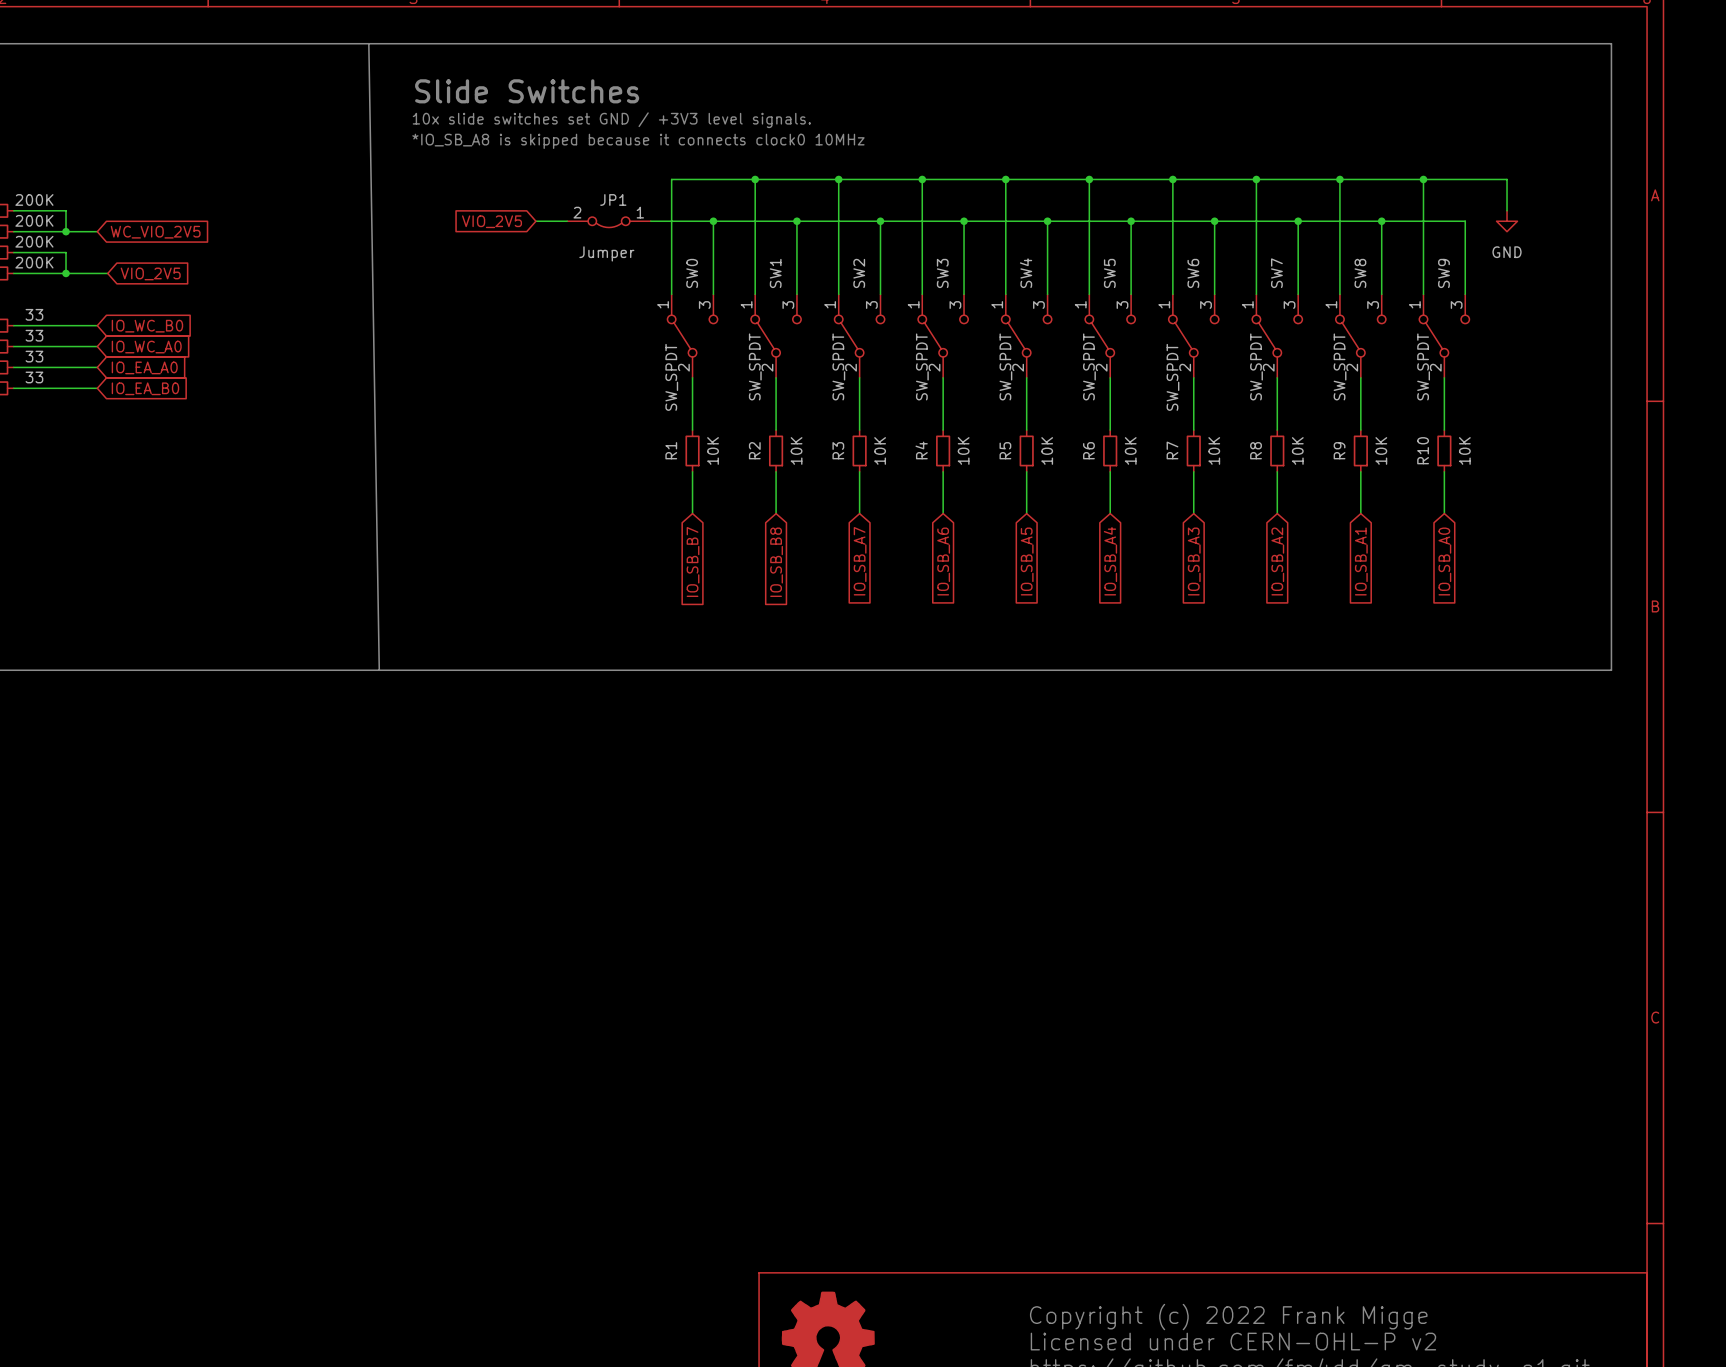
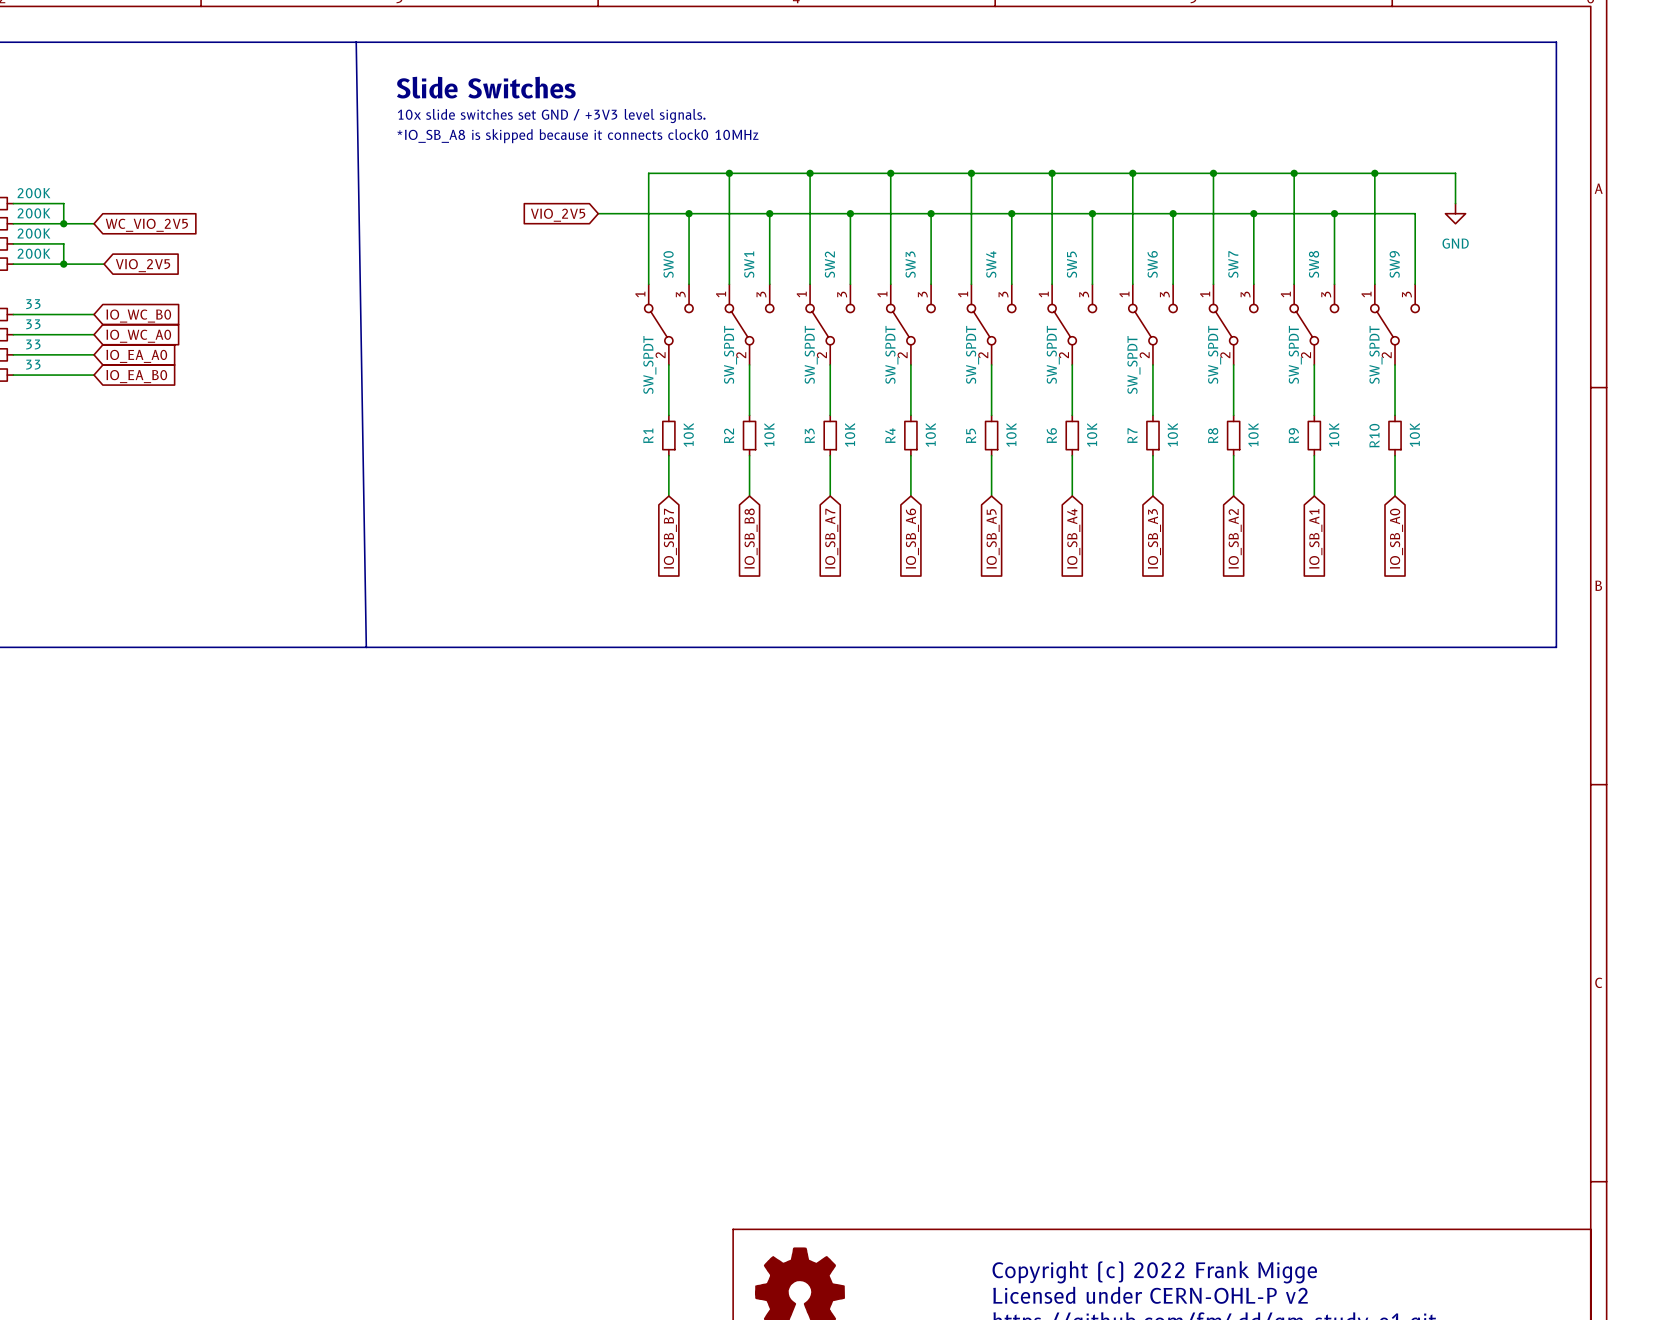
global label position: VIO_2V5 (492, 221) -> VIO_2V5 (558, 215)
JP1: Jumper (609, 222) -> none

